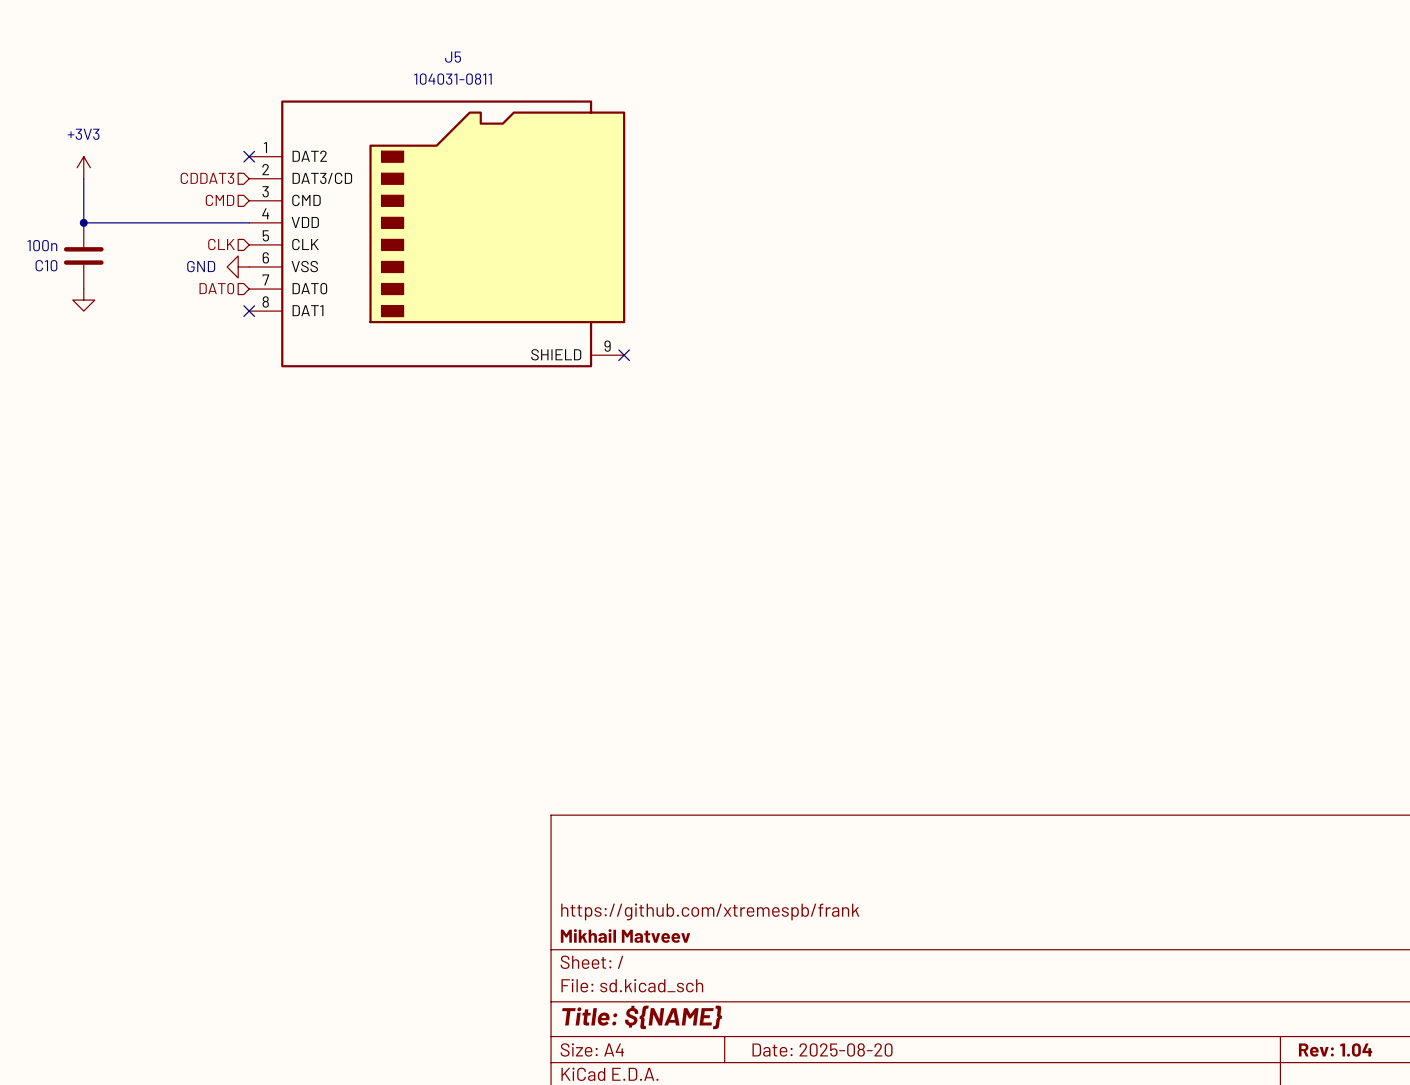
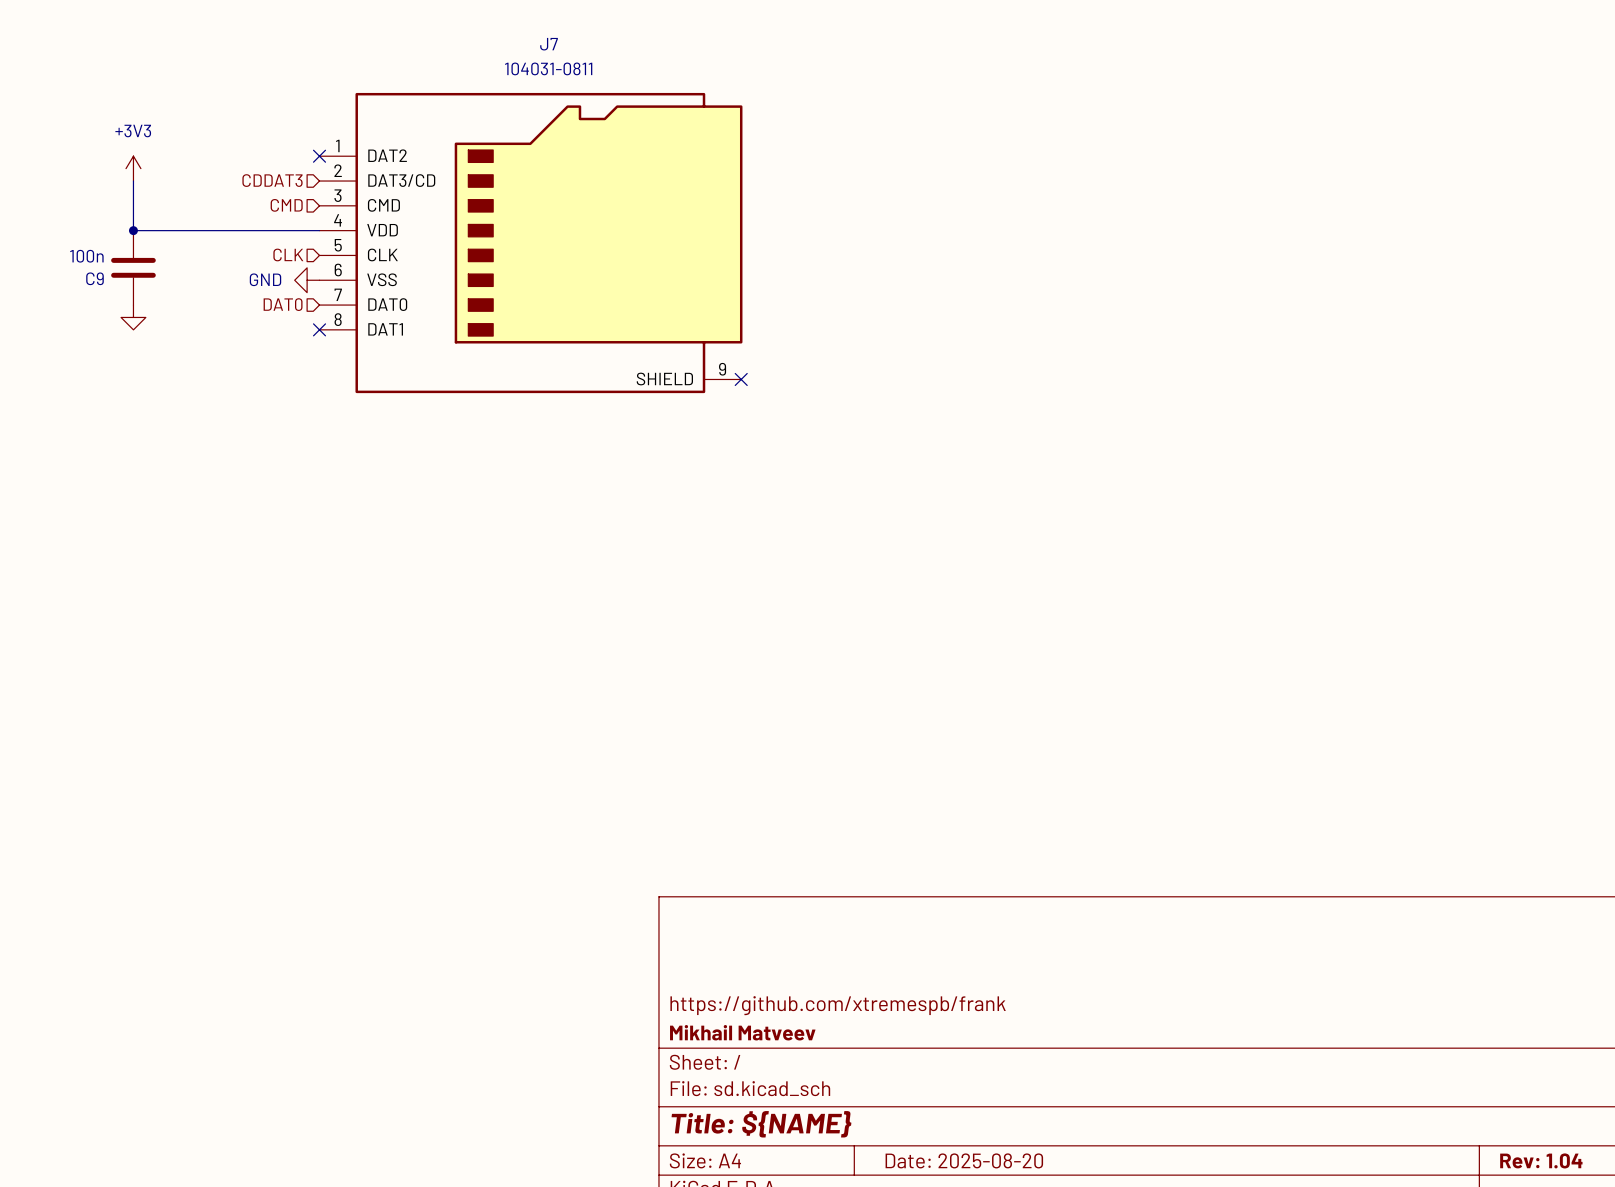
J5 name: J5 (453, 57) -> J7 (549, 44)
C10 name: C10 (46, 265) -> C9 (95, 278)

